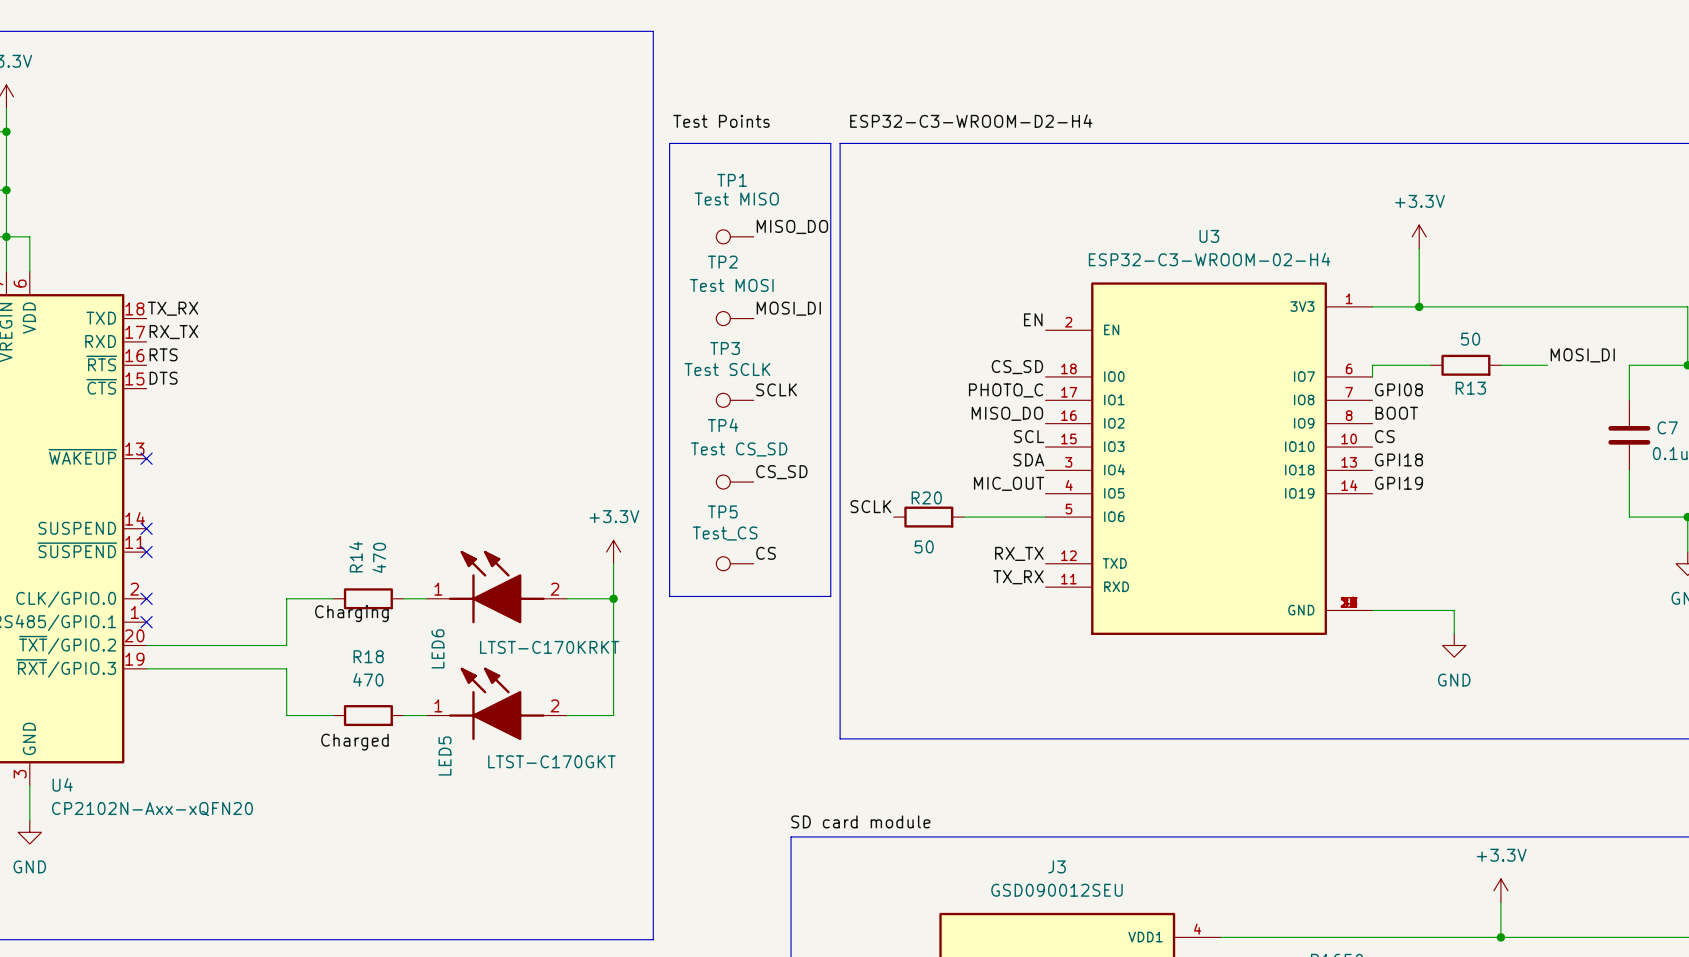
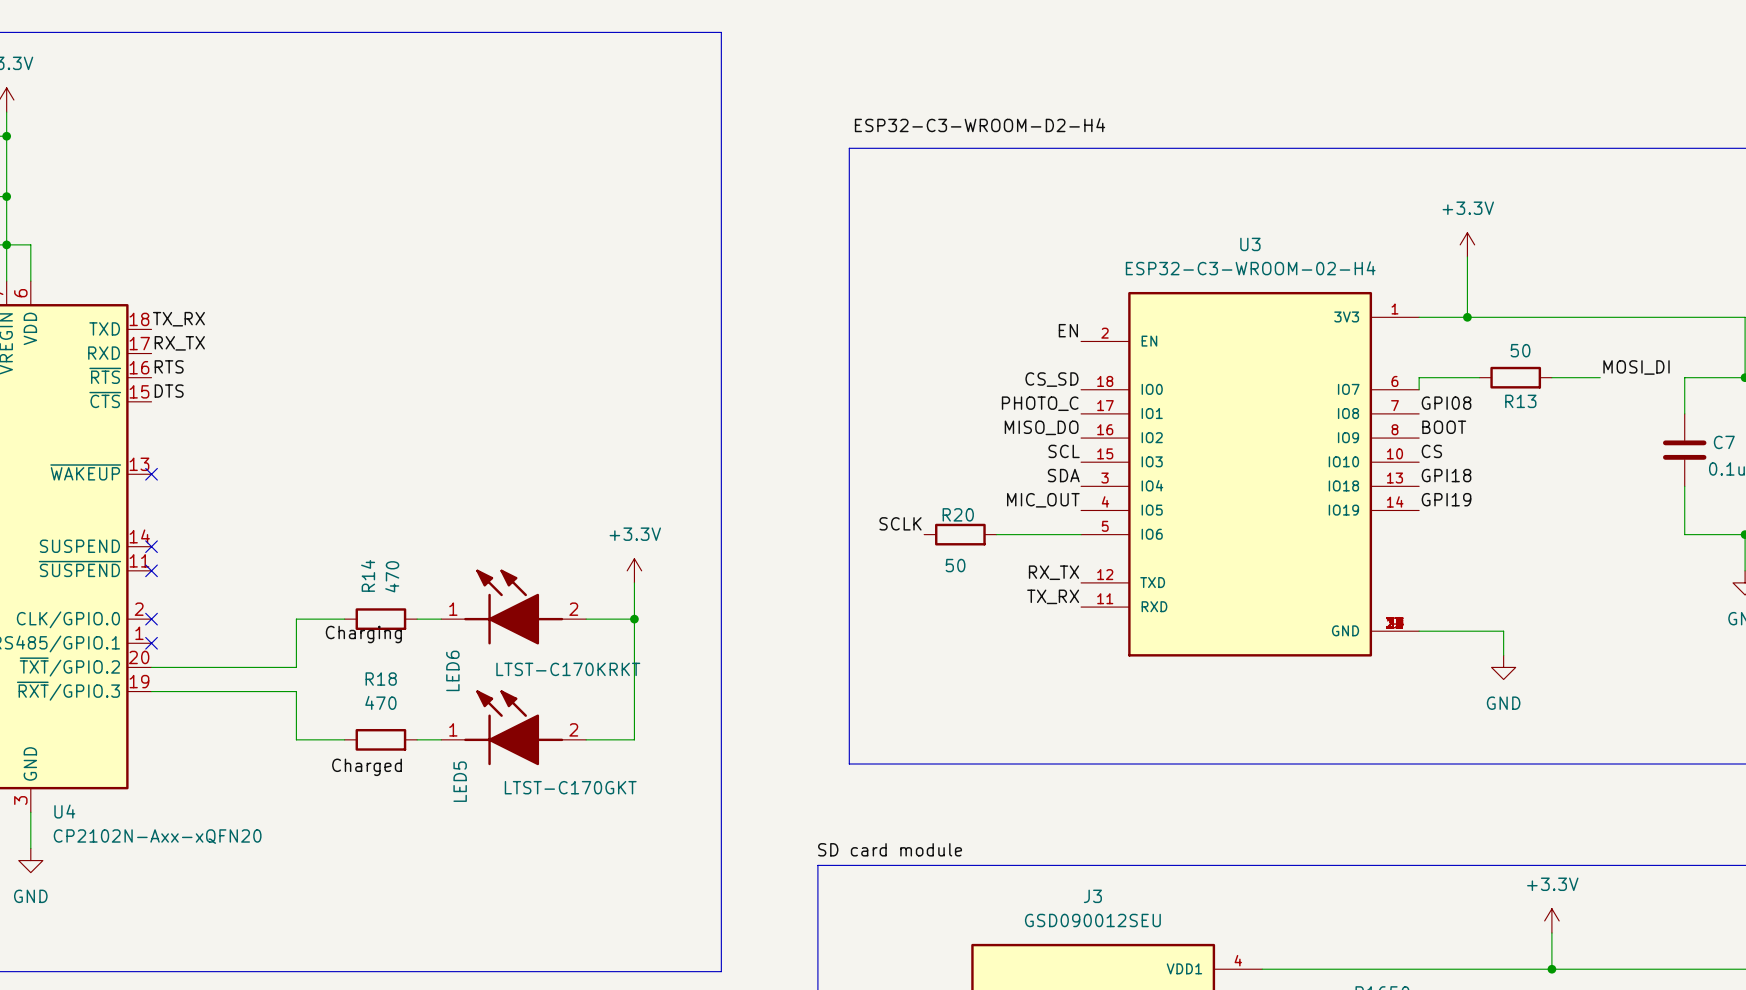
line: (653, 31) (653, 939) -> (675, 32) (721, 32) (721, 971) (675, 971)
label: Test Points (721, 121) -> none
label position: ESP32-C3-WROOM-D2-H4 (971, 121) -> ESP32-C3-WROOM-D2-H4 (980, 125)
line: (821, 143) (669, 143) (669, 596) (830, 596) (830, 143) -> (868, 148) (858, 148)
line: (840, 143) (840, 738) -> (849, 148) (849, 764) (868, 764)
label: MISO_DO (792, 226) -> none
TP1: Test MISO (735, 236) -> none
label: MOSI_DI (788, 308) -> none
TP2: Test MOSI (735, 318) -> none
label: SCLK (776, 389) -> none
TP3: Test SCLK (735, 400) -> none
label: CS_SD (781, 472) -> none
TP4: Test CS_SD (735, 482) -> none
label: CS (766, 553) -> none
TP5: Test_CS (735, 563) -> none

